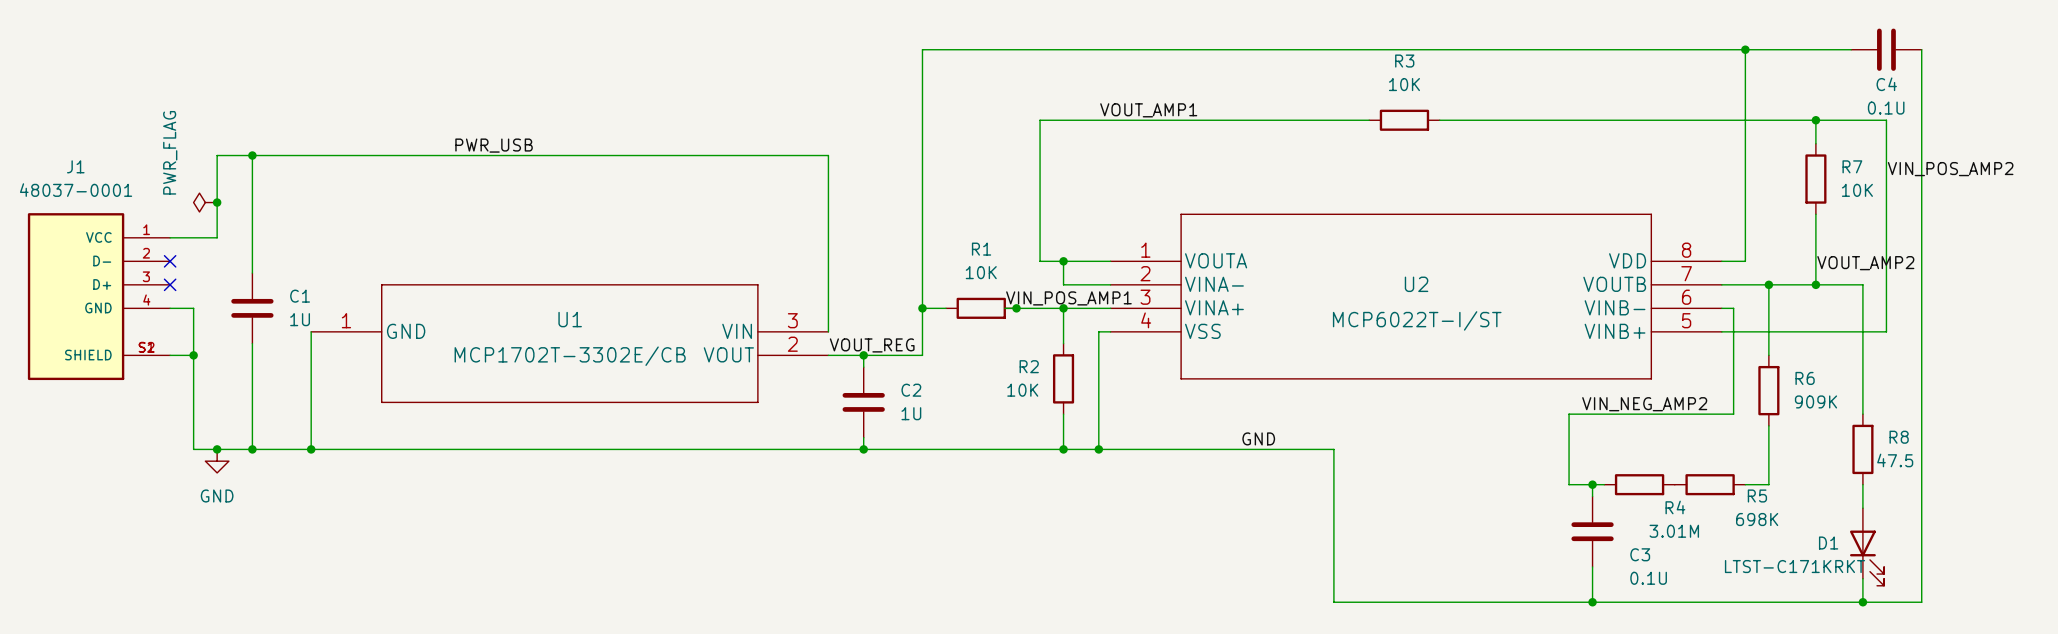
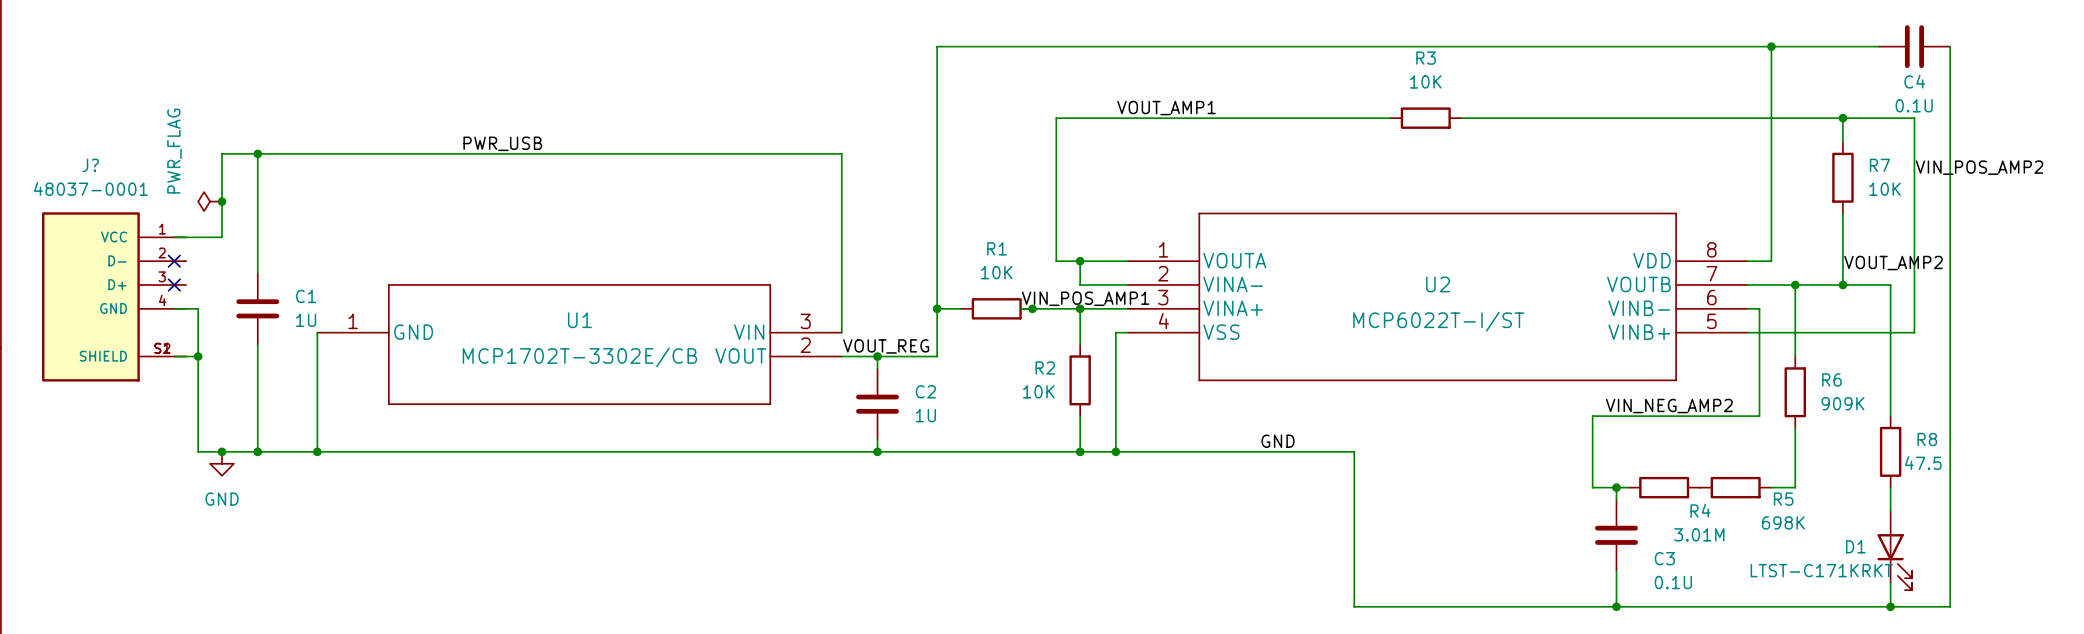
J1: 48037-0001 (98, 296) -> none
J?: none -> 48037-0001 (114, 296)

